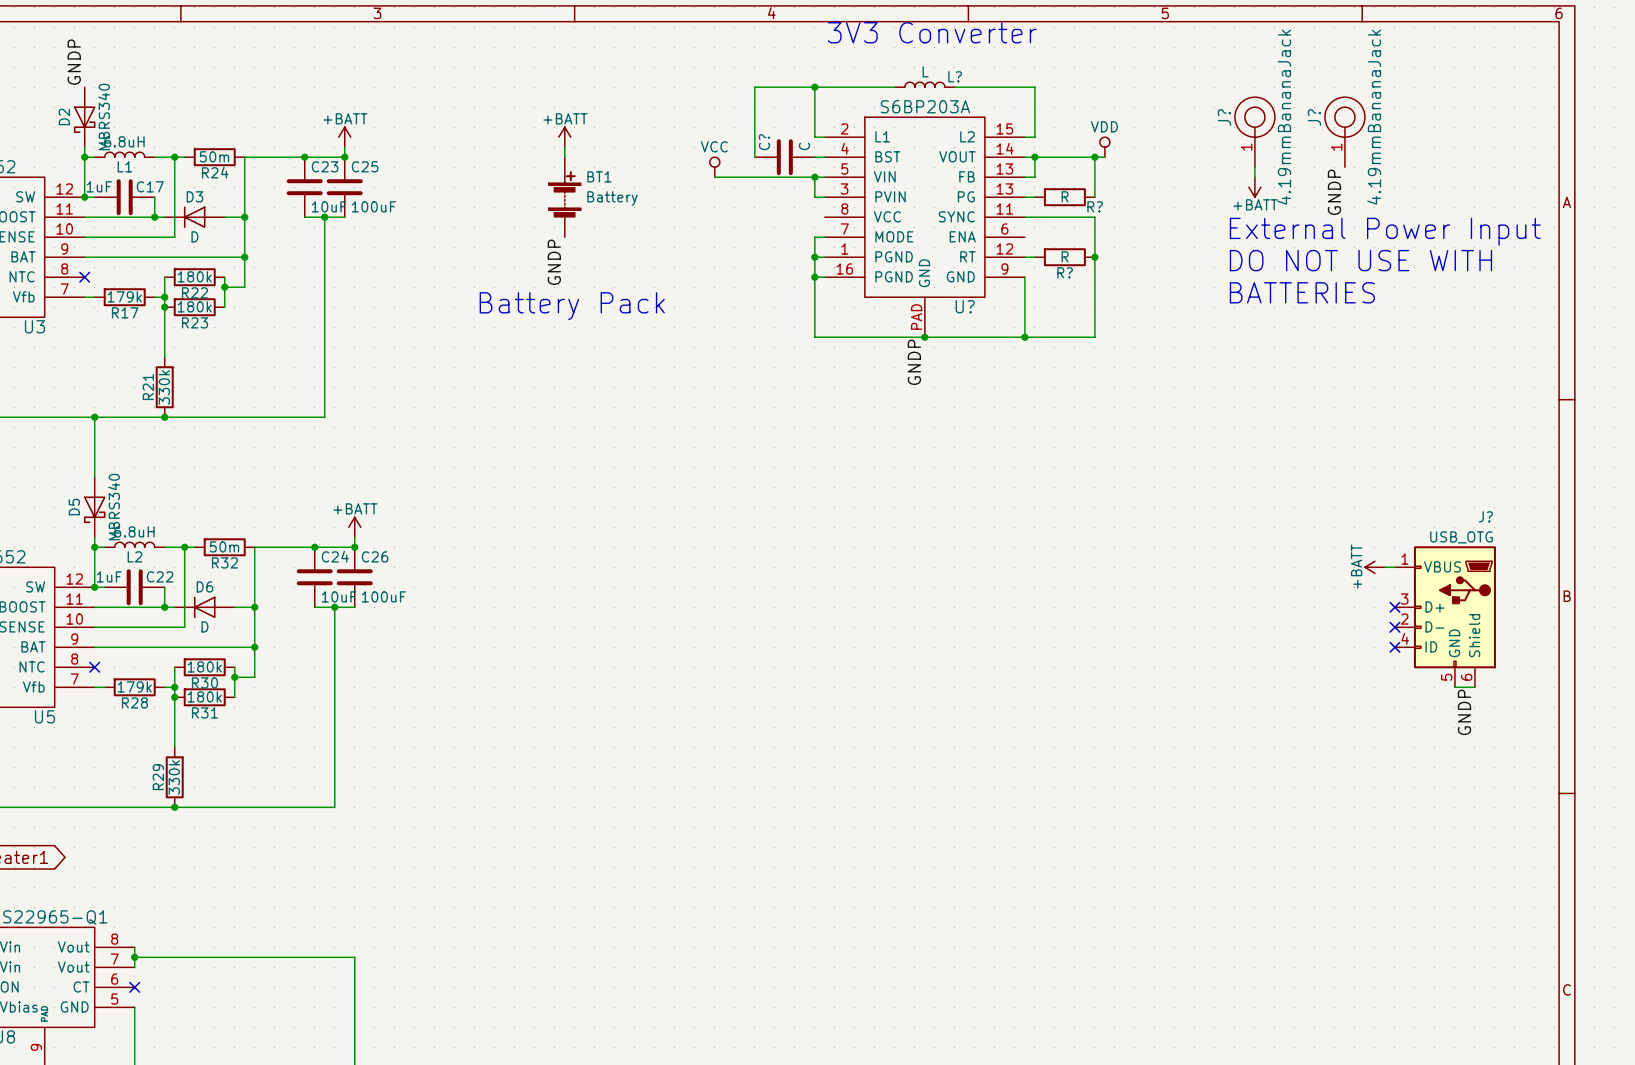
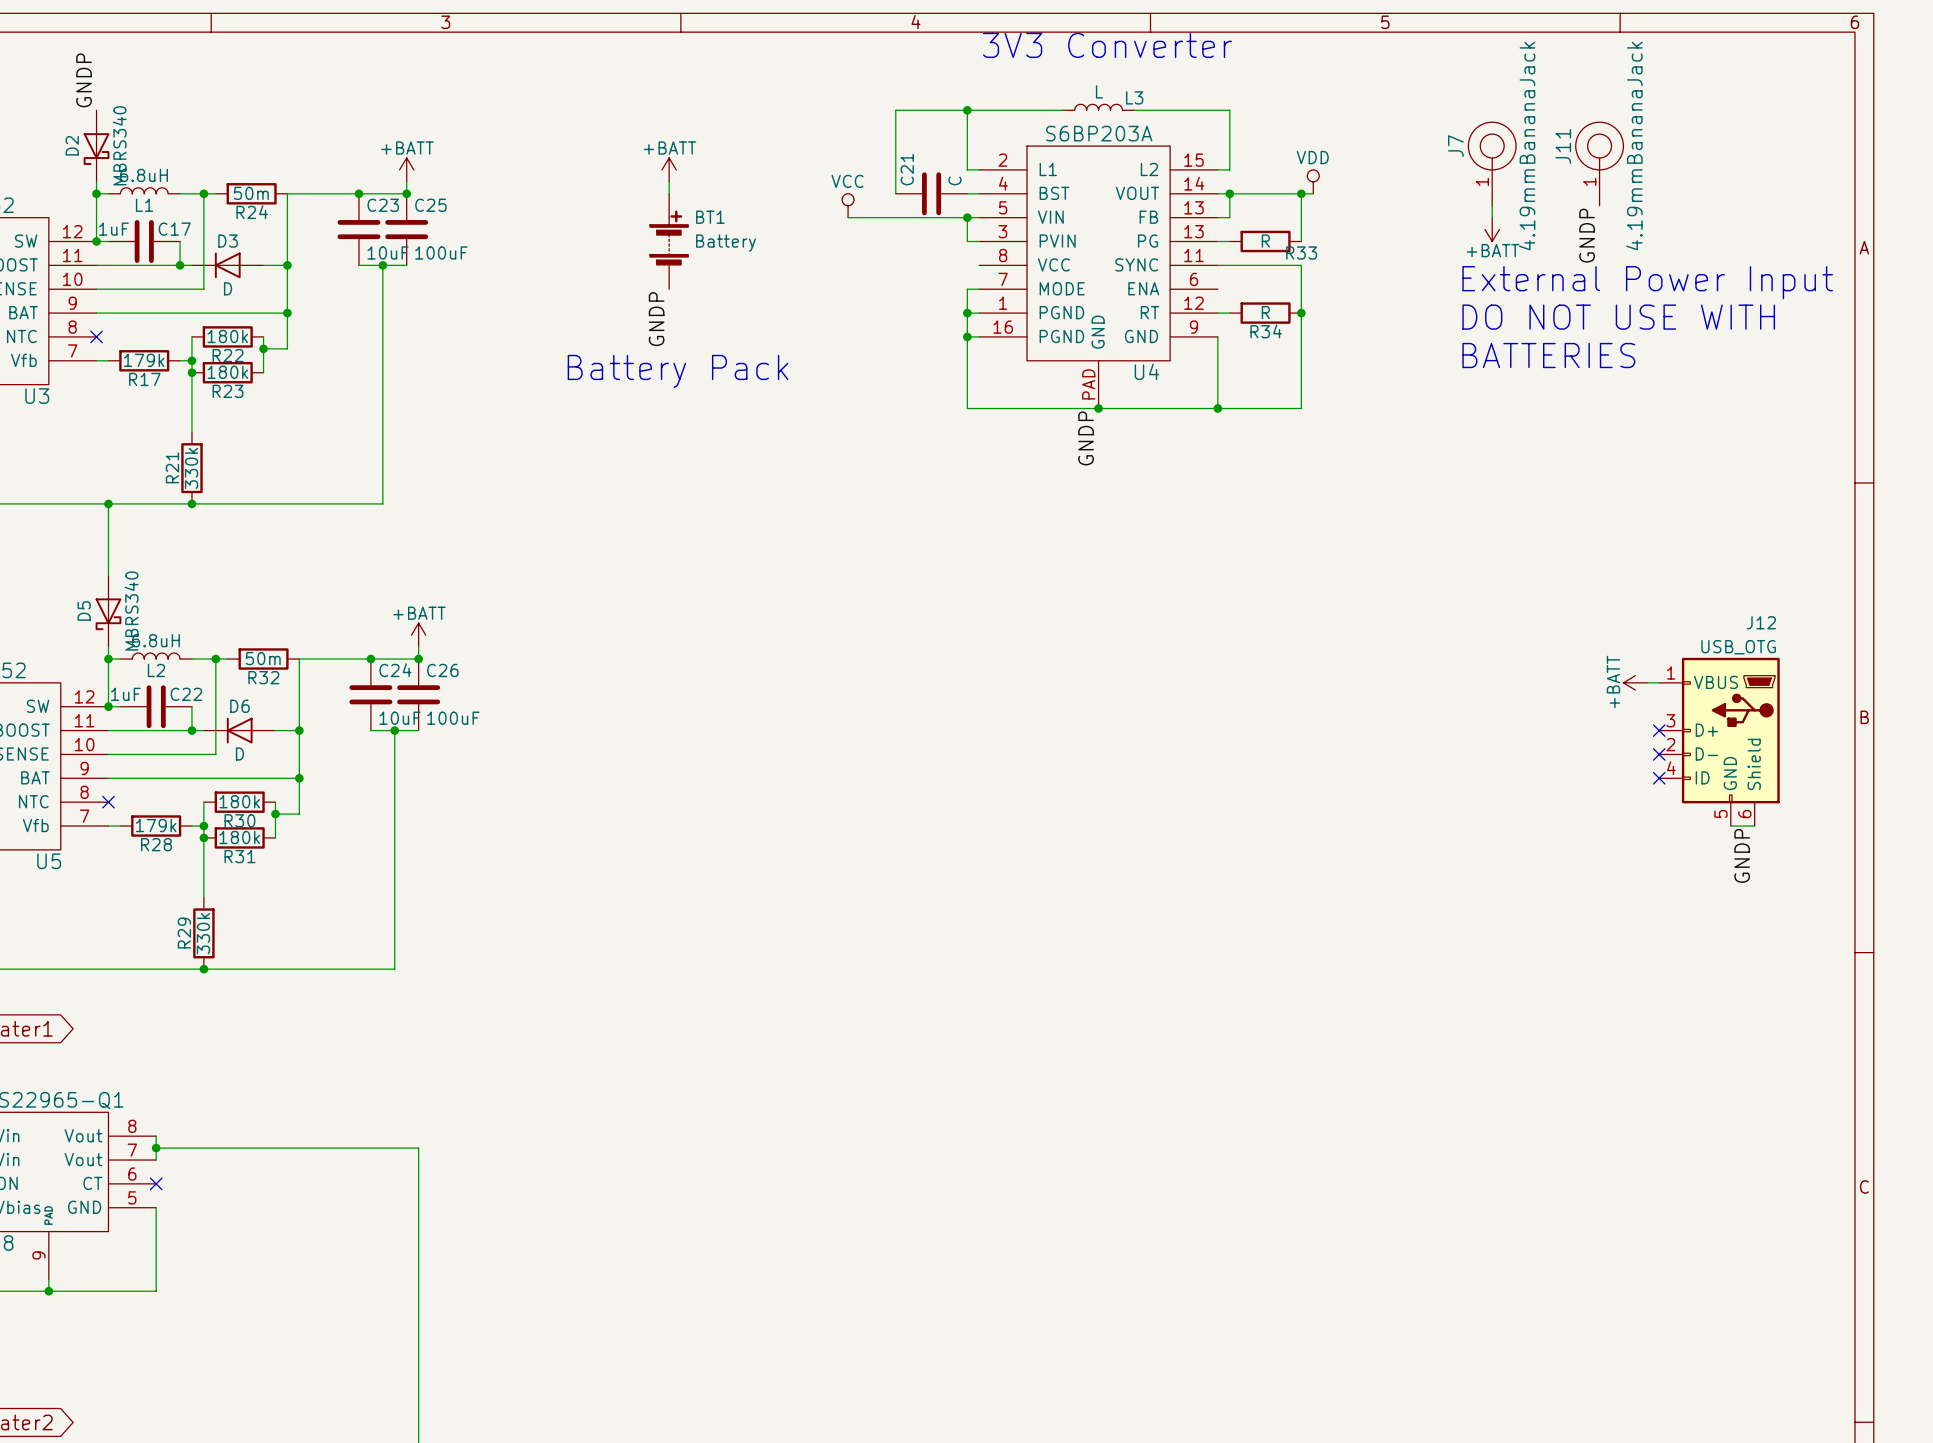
L? name: L? (955, 76) -> L3 (1134, 97)
J? name: J? (1224, 117) -> J7 (1455, 146)
J? name: J? (1314, 117) -> J11 (1563, 146)
C? name: C? (764, 142) -> C21 (907, 169)
R? name: R? (1095, 206) -> R33 (1301, 252)
R? name: R? (1065, 272) -> R34 (1266, 331)
U? name: U? (965, 306) -> U4 (1146, 371)
J? name: J? (1485, 516) -> J12 (1761, 622)

